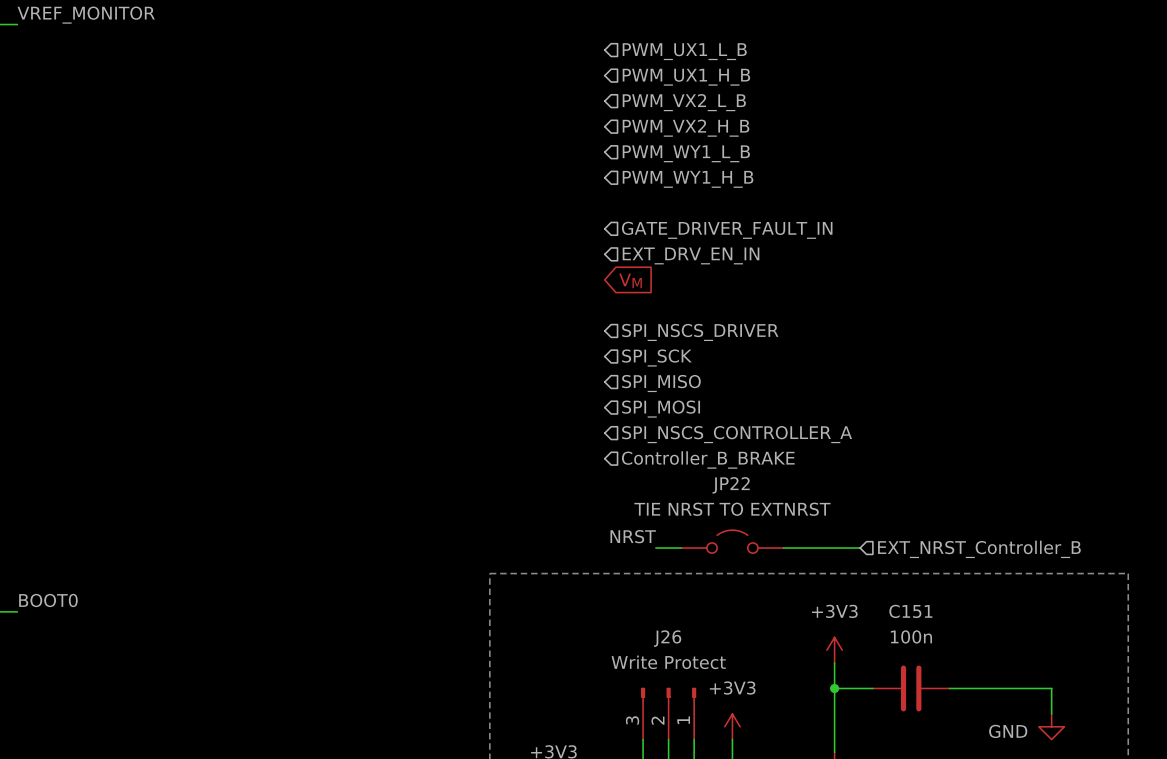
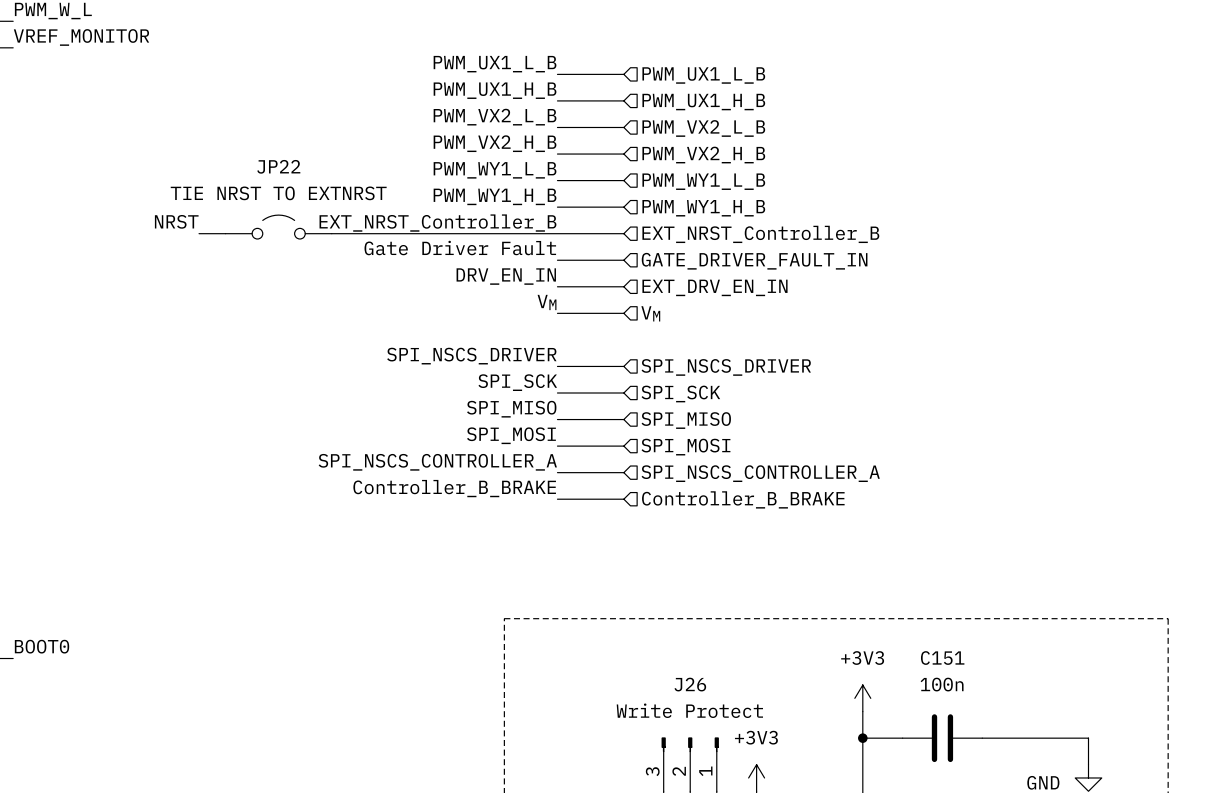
label: none -> PWM_UX1_L_B (495, 64)
wire: none -> (557, 74) (623, 74)
label: none -> PWM_UX1_H_B (495, 90)
wire: none -> (557, 100) (623, 100)
label: none -> PWM_VX2_L_B (495, 117)
wire: none -> (557, 127) (623, 127)
label: none -> PWM_VX2_H_B (495, 143)
wire: none -> (557, 154) (623, 154)
label: none -> PWM_WY1_L_B (495, 170)
wire: none -> (557, 180) (623, 180)
label: none -> PWM_WY1_H_B (495, 196)
wire: none -> (557, 207) (623, 207)
label: none -> NRST (176, 221)
label: none -> EXT_NRST_Controller_B (437, 223)
wire: none -> (199, 233) (225, 233)
wire: none -> (331, 233) (623, 233)
hierarchical label: none -> EXT_NRST_Controller_B (760, 234)
label: none -> Gate Driver Fault (460, 248)
wire: none -> (557, 260) (623, 260)
label: none -> DRV_EN_IN (506, 276)
wire: none -> (557, 286) (623, 286)
label: none -> VM (547, 302)
wire: none -> (557, 313) (623, 313)
global label: VM (630, 280) -> none
hierarchical label: none -> VM (650, 313)
label: none -> SPI_NSCS_DRIVER (471, 356)
wire: none -> (557, 366) (623, 366)
label: none -> SPI_SCK (517, 382)
wire: none -> (557, 392) (623, 392)
label: none -> SPI_MISO (511, 409)
wire: none -> (557, 419) (623, 419)
label: none -> SPI_MOSI (511, 435)
wire: none -> (557, 446) (623, 446)
label: none -> SPI_NSCS_CONTROLLER_A (437, 462)
wire: none -> (557, 472) (623, 472)
label: none -> Controller_B_BRAKE (454, 488)
wire: none -> (557, 499) (623, 499)
label: NRST (633, 536) -> none
JP22 position: (732, 541) -> (278, 227)
wire: (655, 548) (681, 548) -> none
wire: (783, 548) (860, 548) -> none
hierarchical label: EXT_NRST_Controller_B (979, 549) -> none

